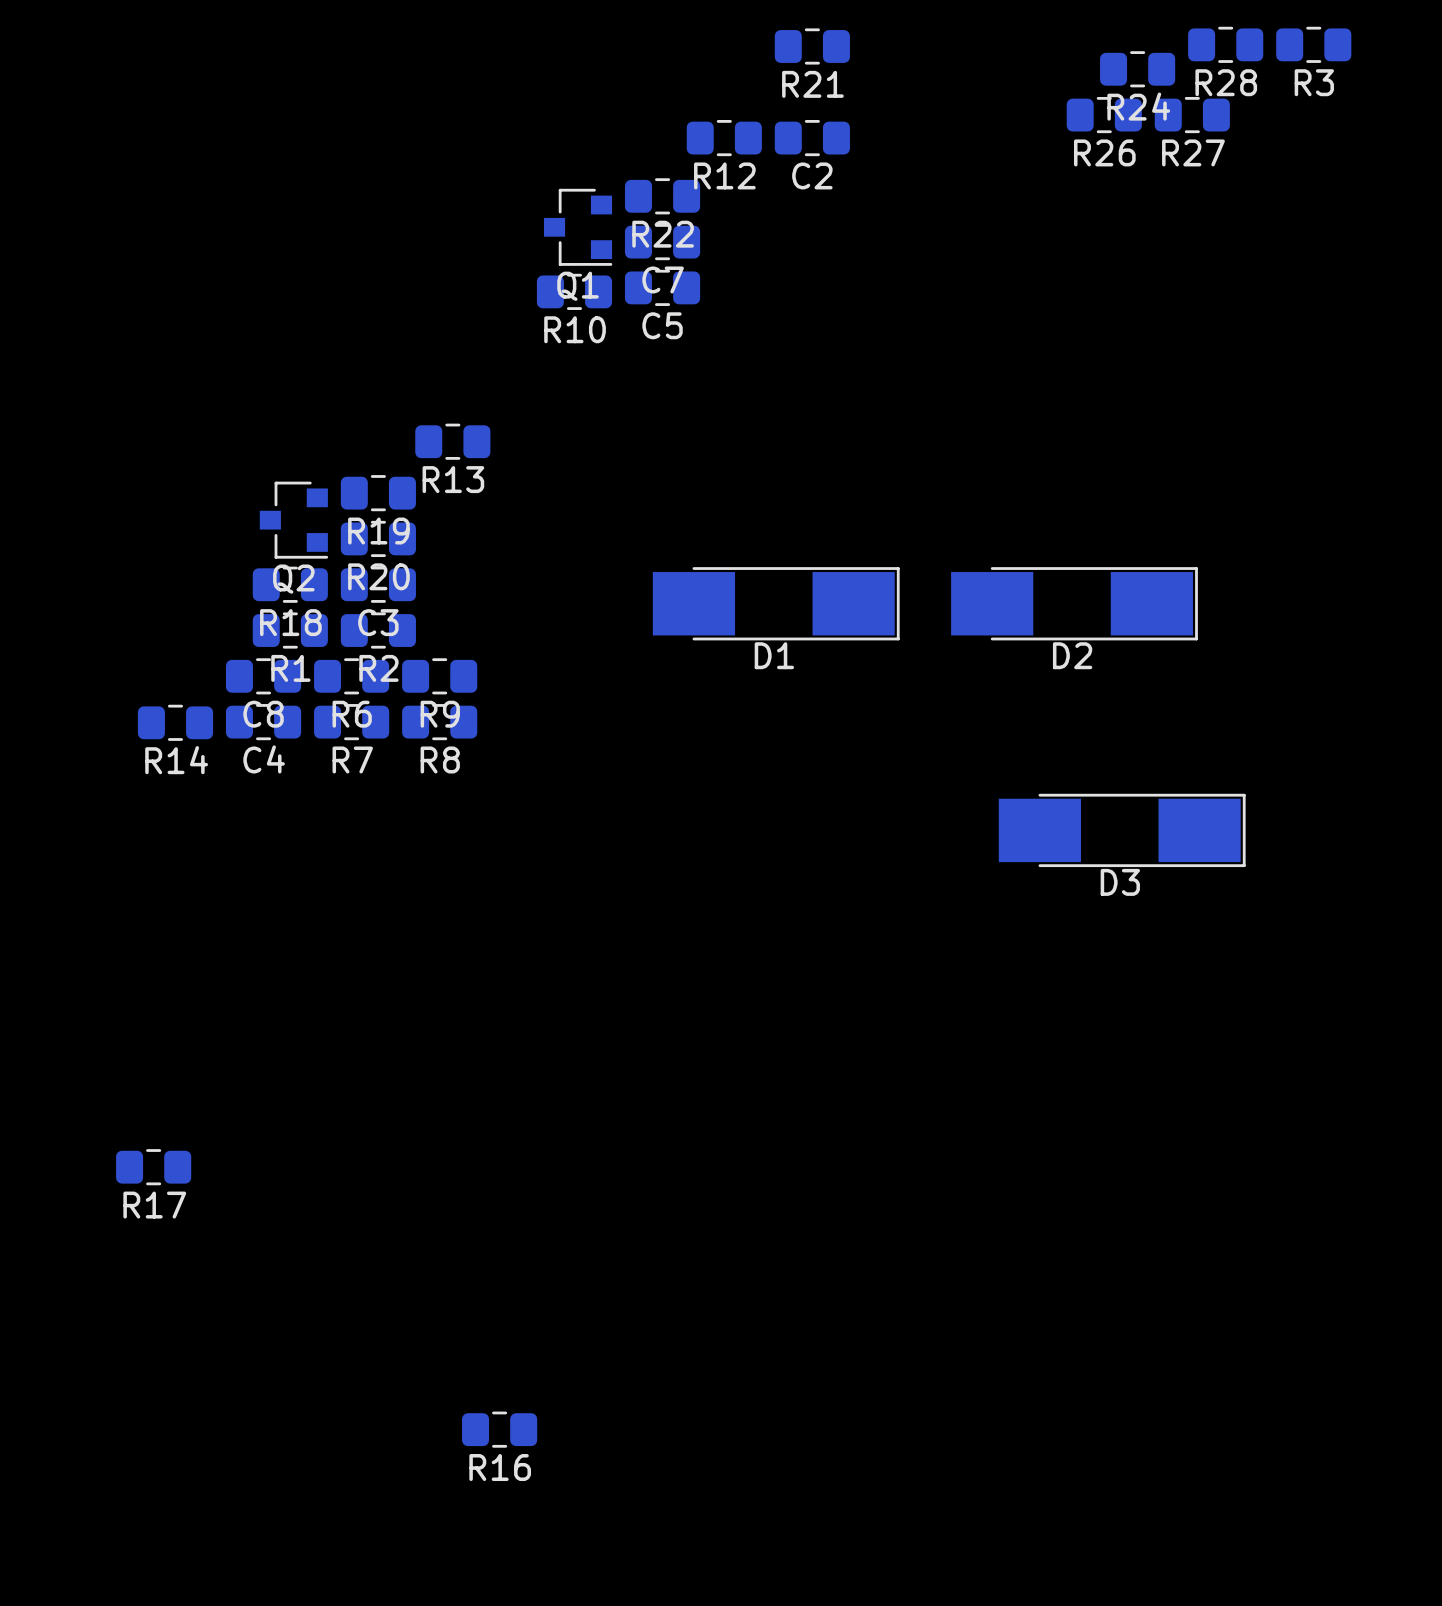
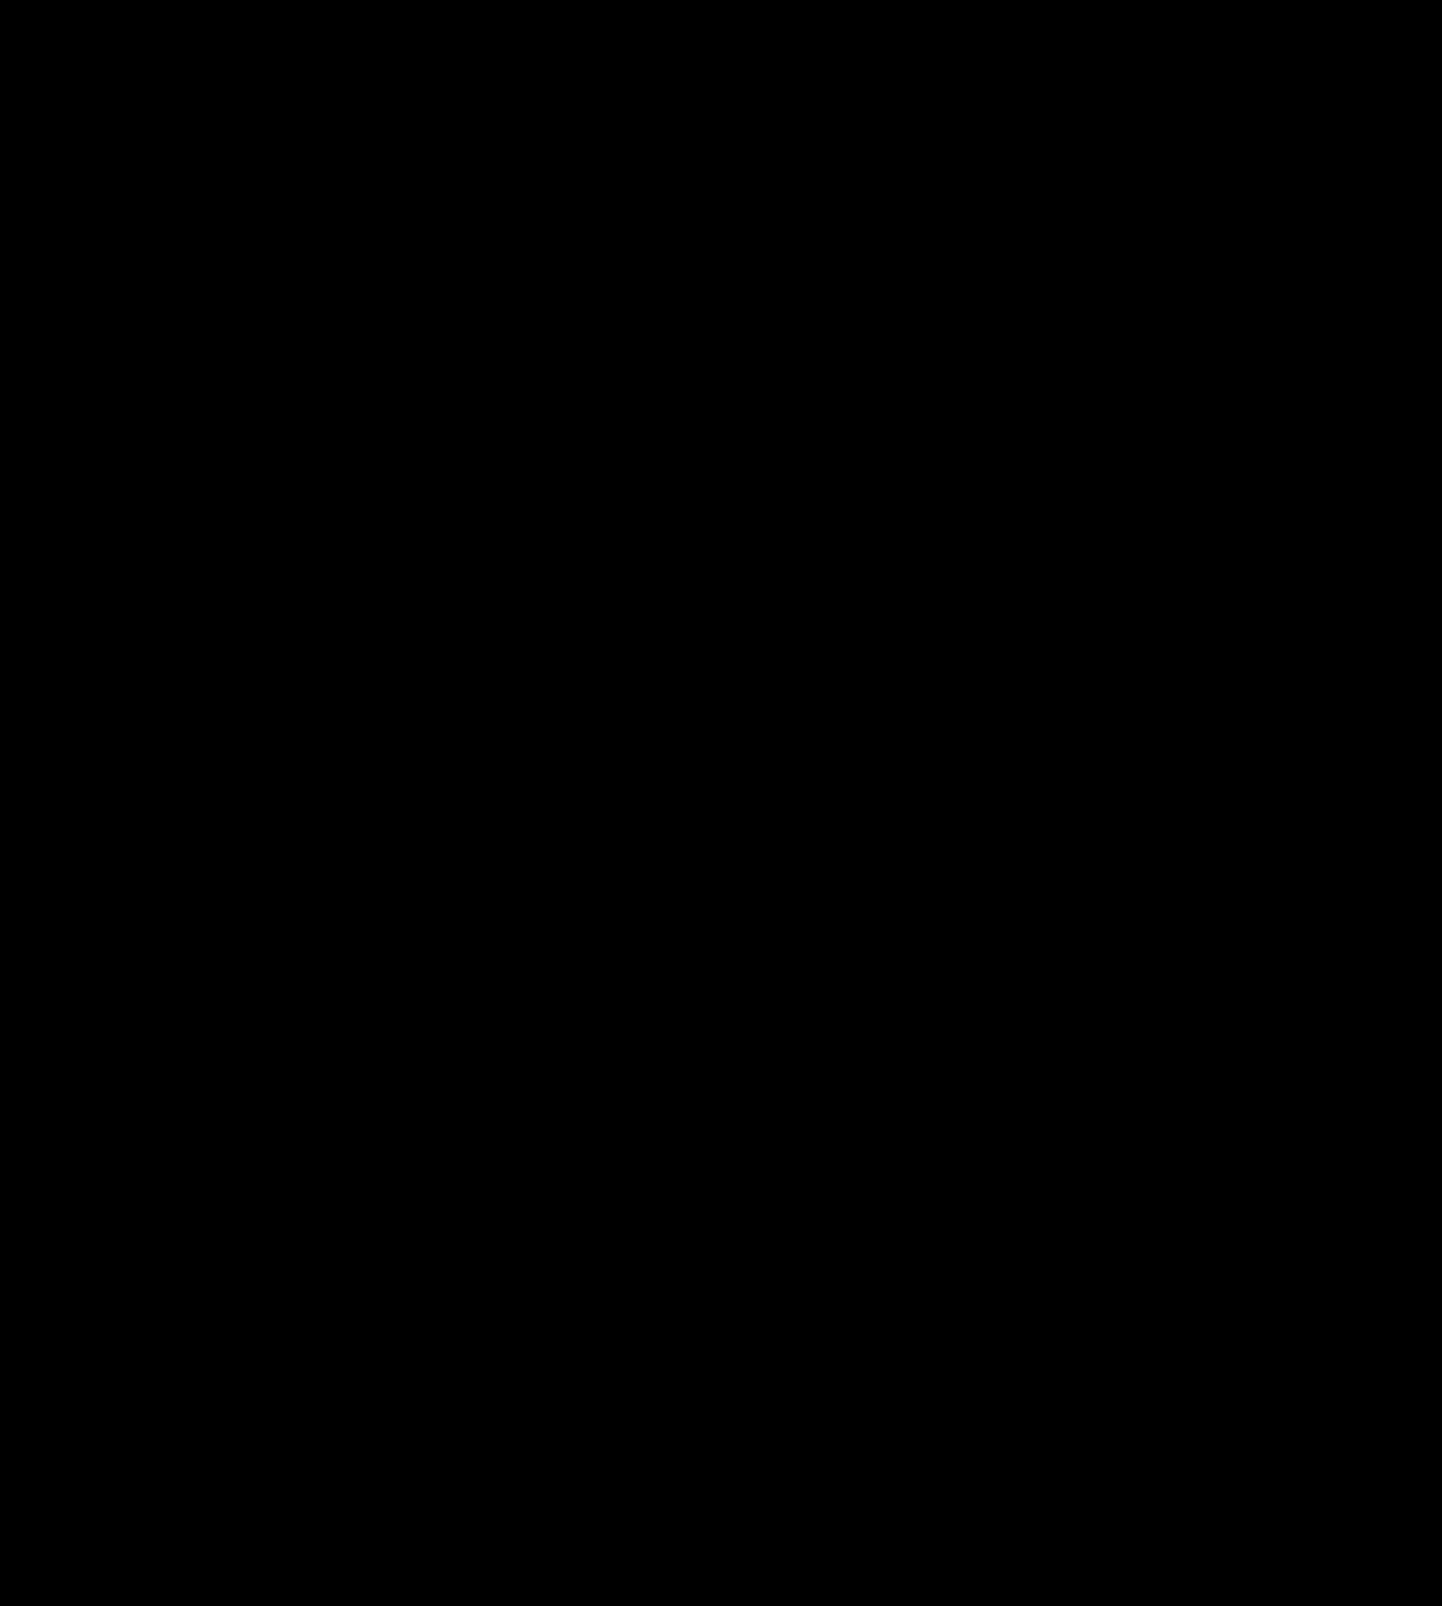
R28: (1225, 44) -> none
R3: (1313, 44) -> none
R21: (812, 46) -> none
R24: (1137, 69) -> none
R26: (1104, 115) -> none
R27: (1192, 115) -> none
R12: (724, 138) -> none
C2: (812, 138) -> none
R22: (662, 196) -> none
Q1: (578, 227) -> none
C7: (662, 242) -> none
C5: (662, 287) -> none
R10: (574, 291) -> none
R13: (452, 441) -> none
R19: (378, 493) -> none
Q2: (293, 520) -> none
R20: (378, 538) -> none
R18: (290, 584) -> none
C3: (378, 584) -> none
D1: (776, 603) -> none
D2: (1074, 603) -> none
R1: (290, 630) -> none
R2: (378, 630) -> none
C8: (263, 676) -> none
R6: (351, 676) -> none
R9: (439, 676) -> none
R14: (175, 722) -> none
C4: (263, 722) -> none
R7: (351, 722) -> none
R8: (439, 722) -> none
D3: (1122, 830) -> none
R17: (153, 1167) -> none
R16: (499, 1429) -> none

